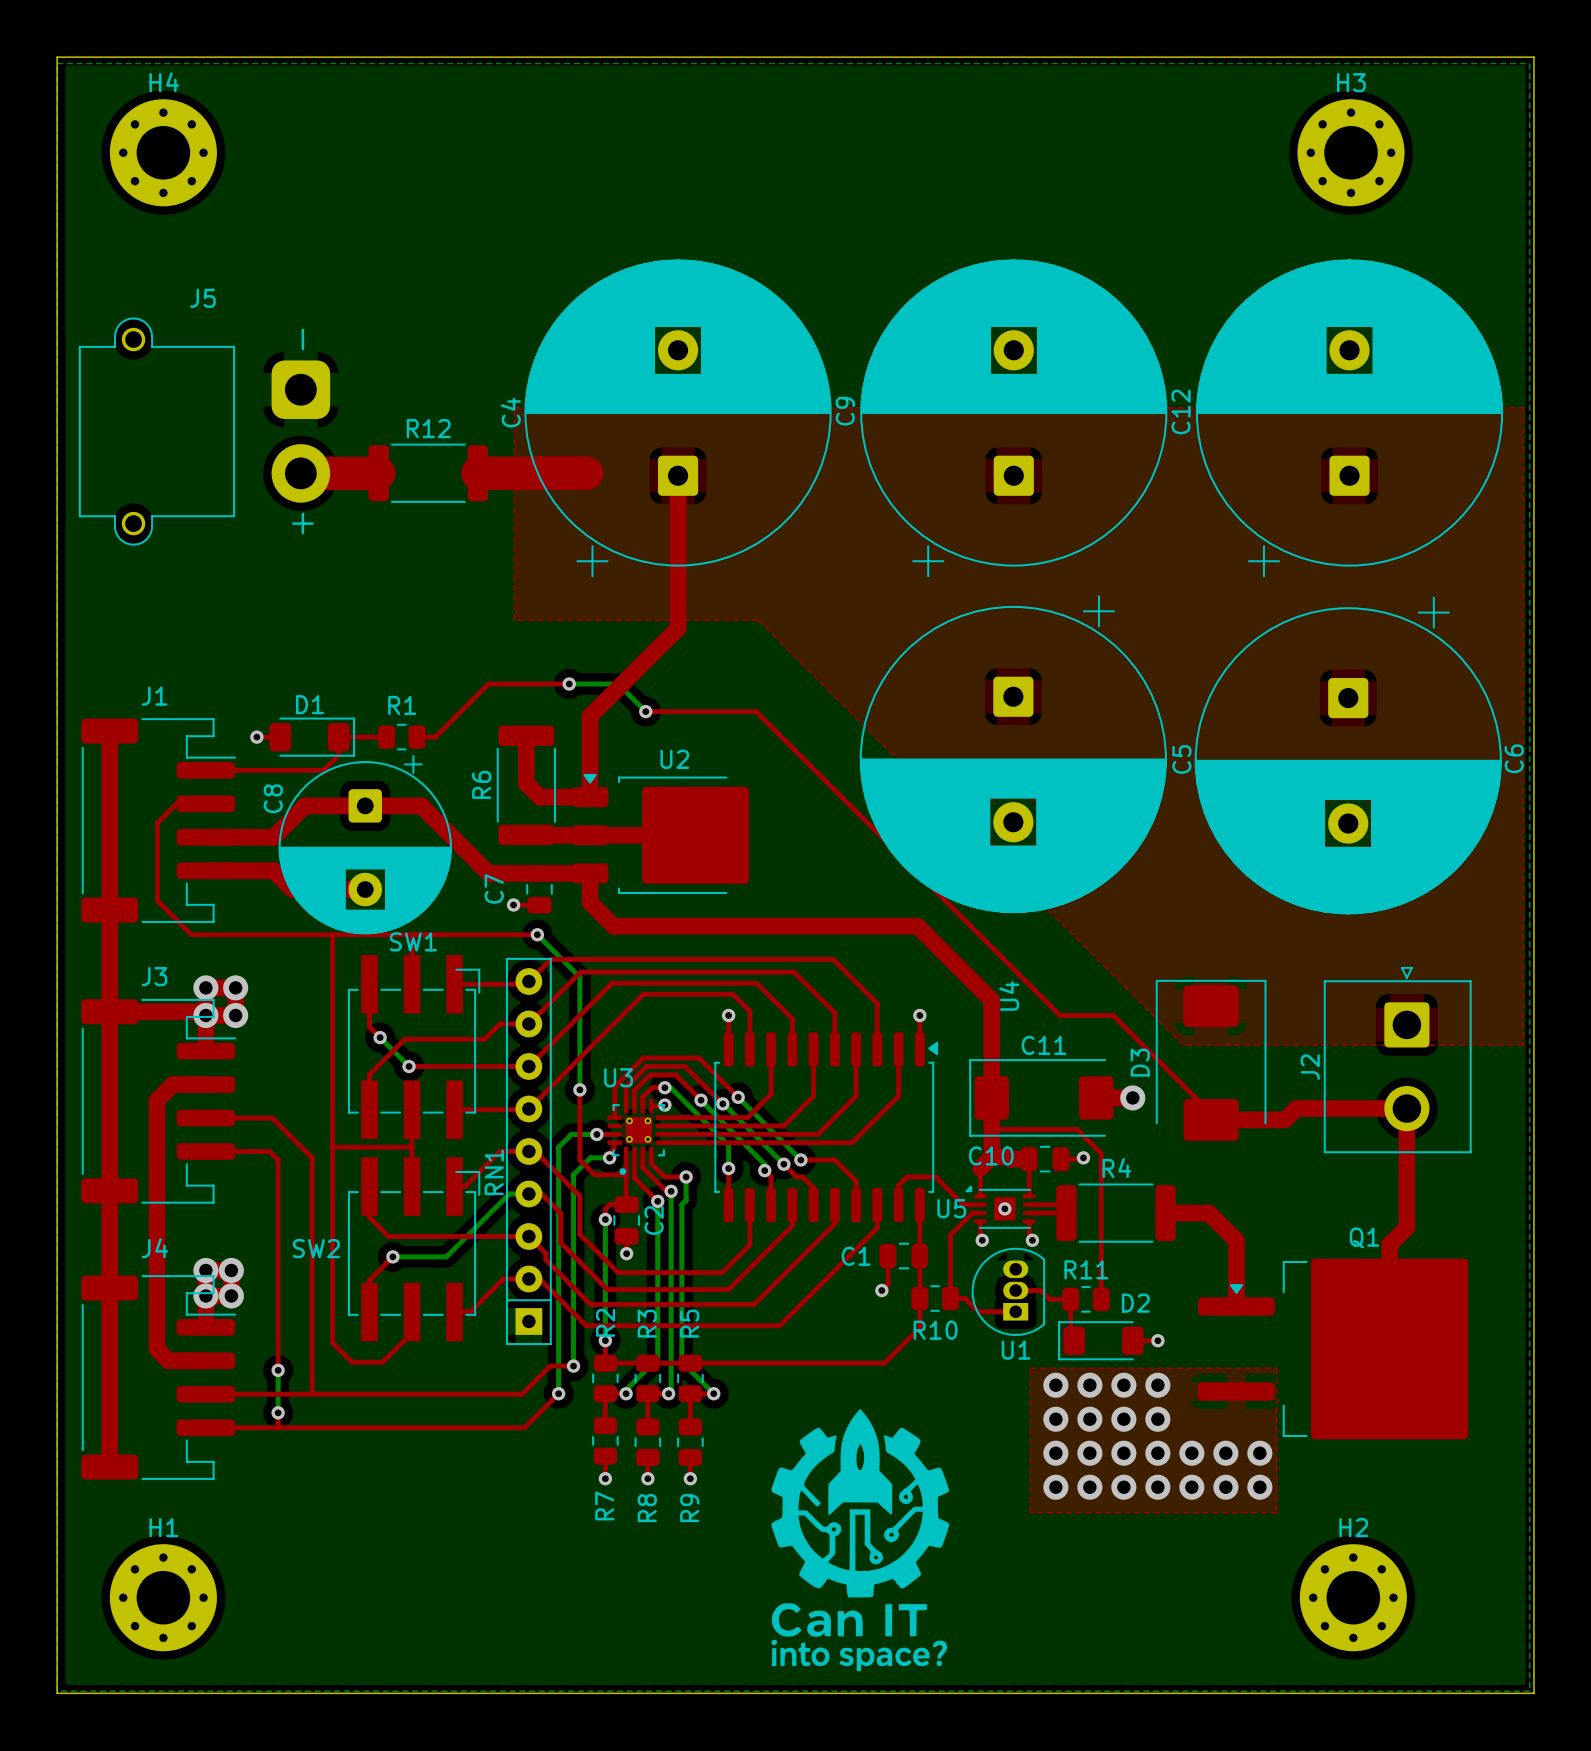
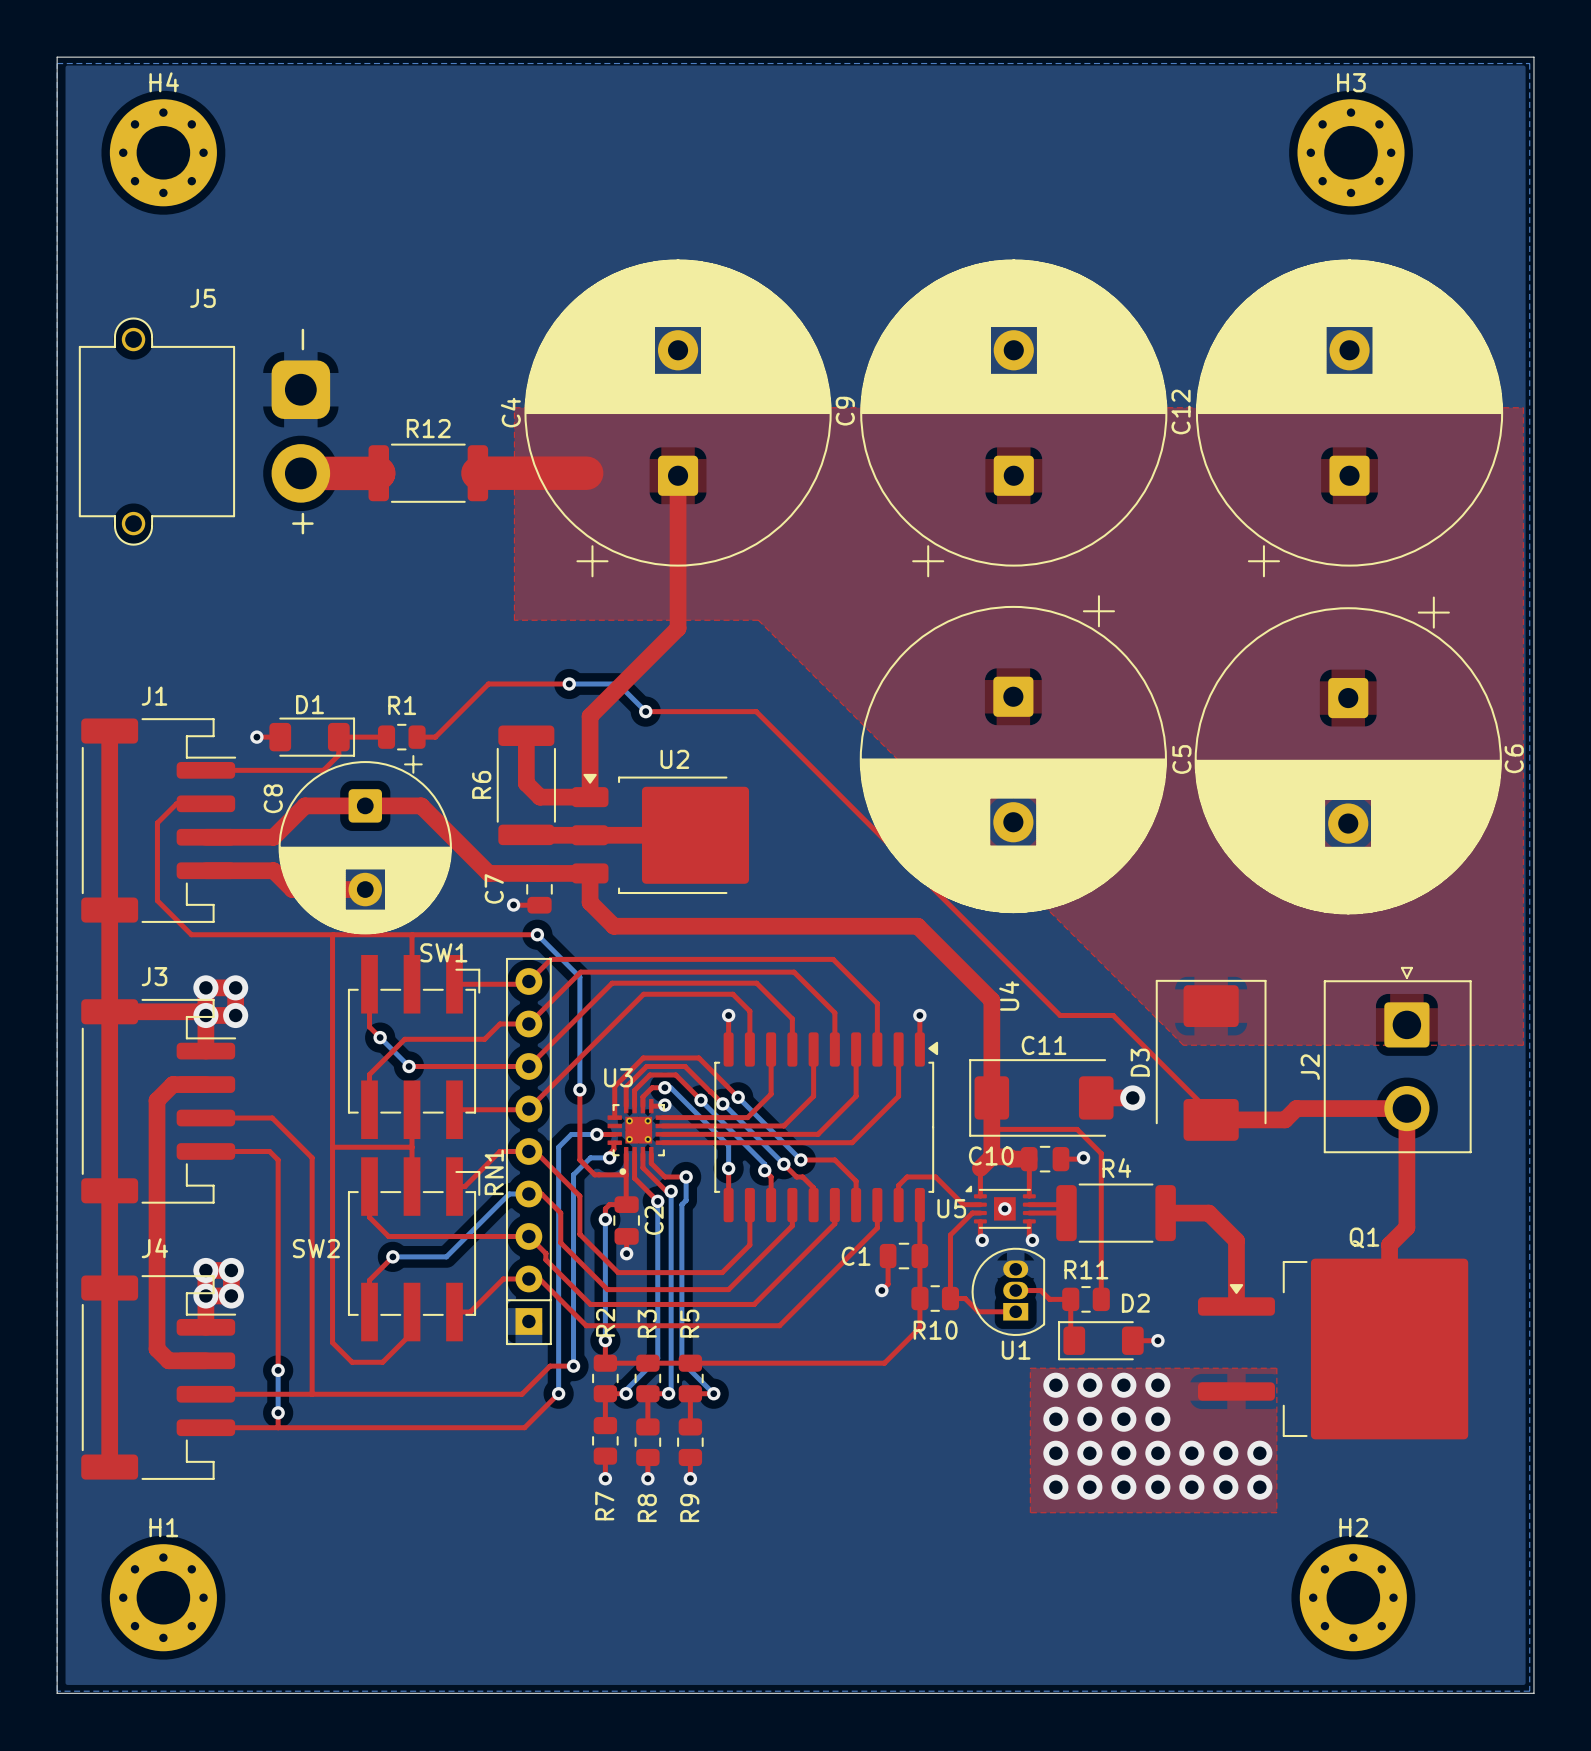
SW1 name position: SW1 (413, 941) -> SW1 (443, 952)
drawing: [771, 1409, 950, 1672] -> none

